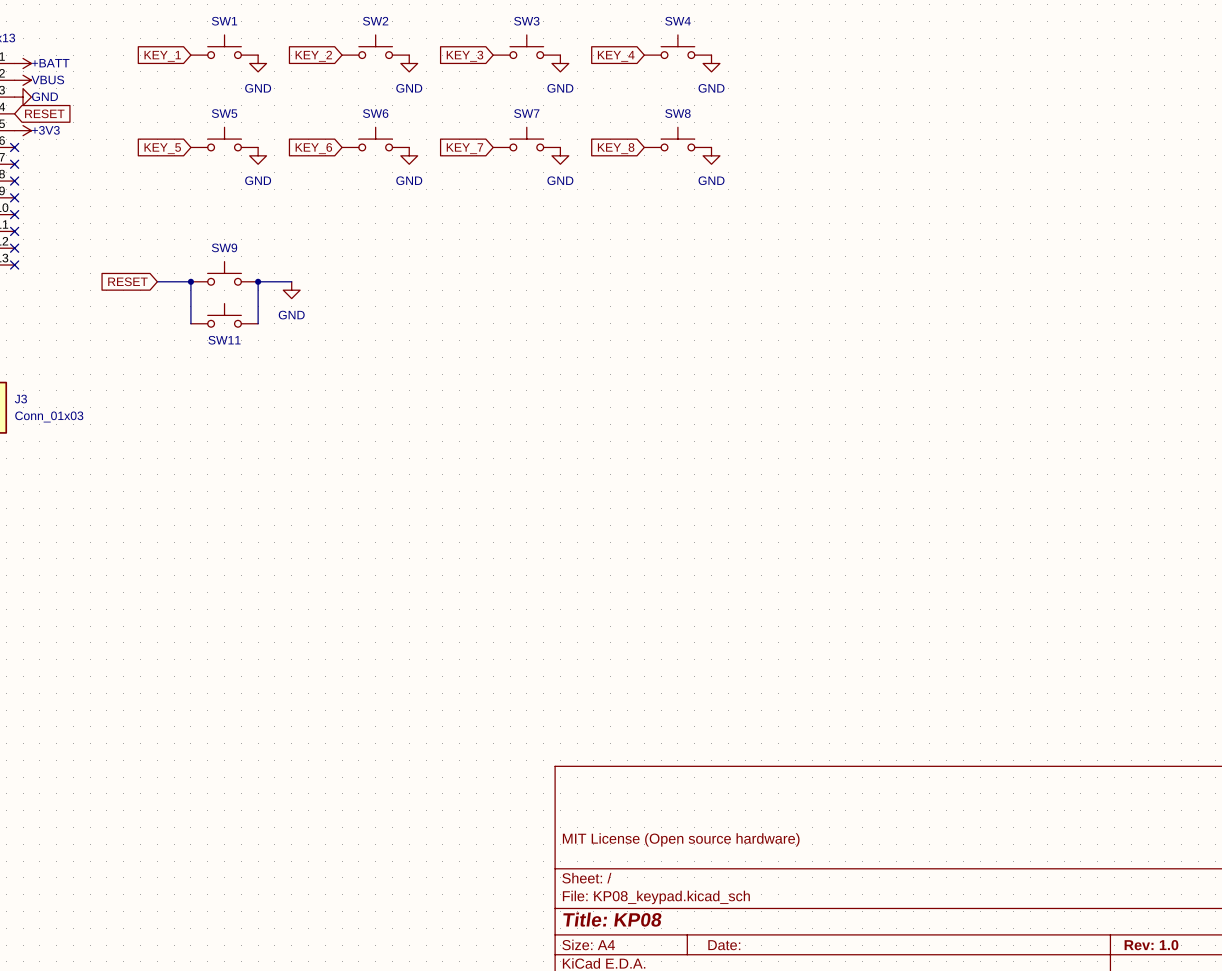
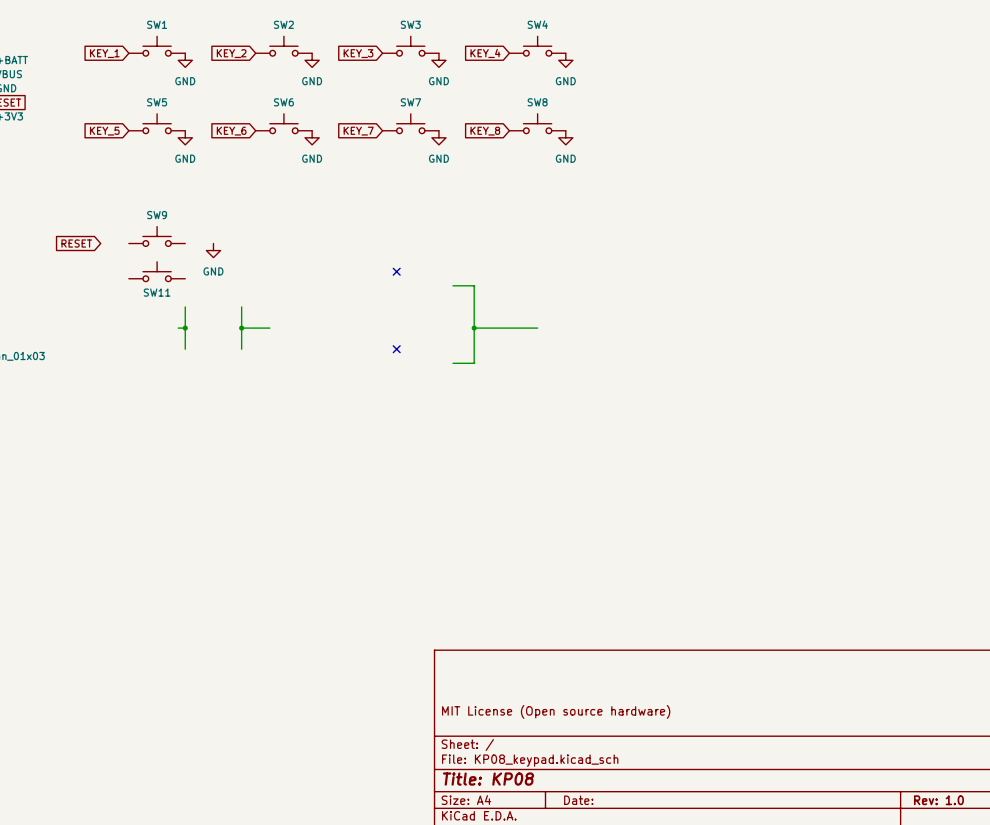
wire: (157, 281) (190, 281) (190, 323) -> none
junction: (190, 281) -> none
junction: (258, 281) -> none
wire: (291, 281) (258, 281) (258, 323) -> none
no-connect mark: none -> (396, 271)
wire: none -> (453, 285) (474, 285) (474, 363) (453, 363)
wire: none -> (185, 306) (185, 349)
wire: none -> (241, 306) (241, 349)
wire: none -> (178, 328) (185, 328)
junction: none -> (185, 328)
wire: none -> (241, 328) (269, 328)
junction: none -> (241, 328)
wire: none -> (474, 328) (537, 328)
junction: none -> (474, 328)
no-connect mark: none -> (396, 349)

